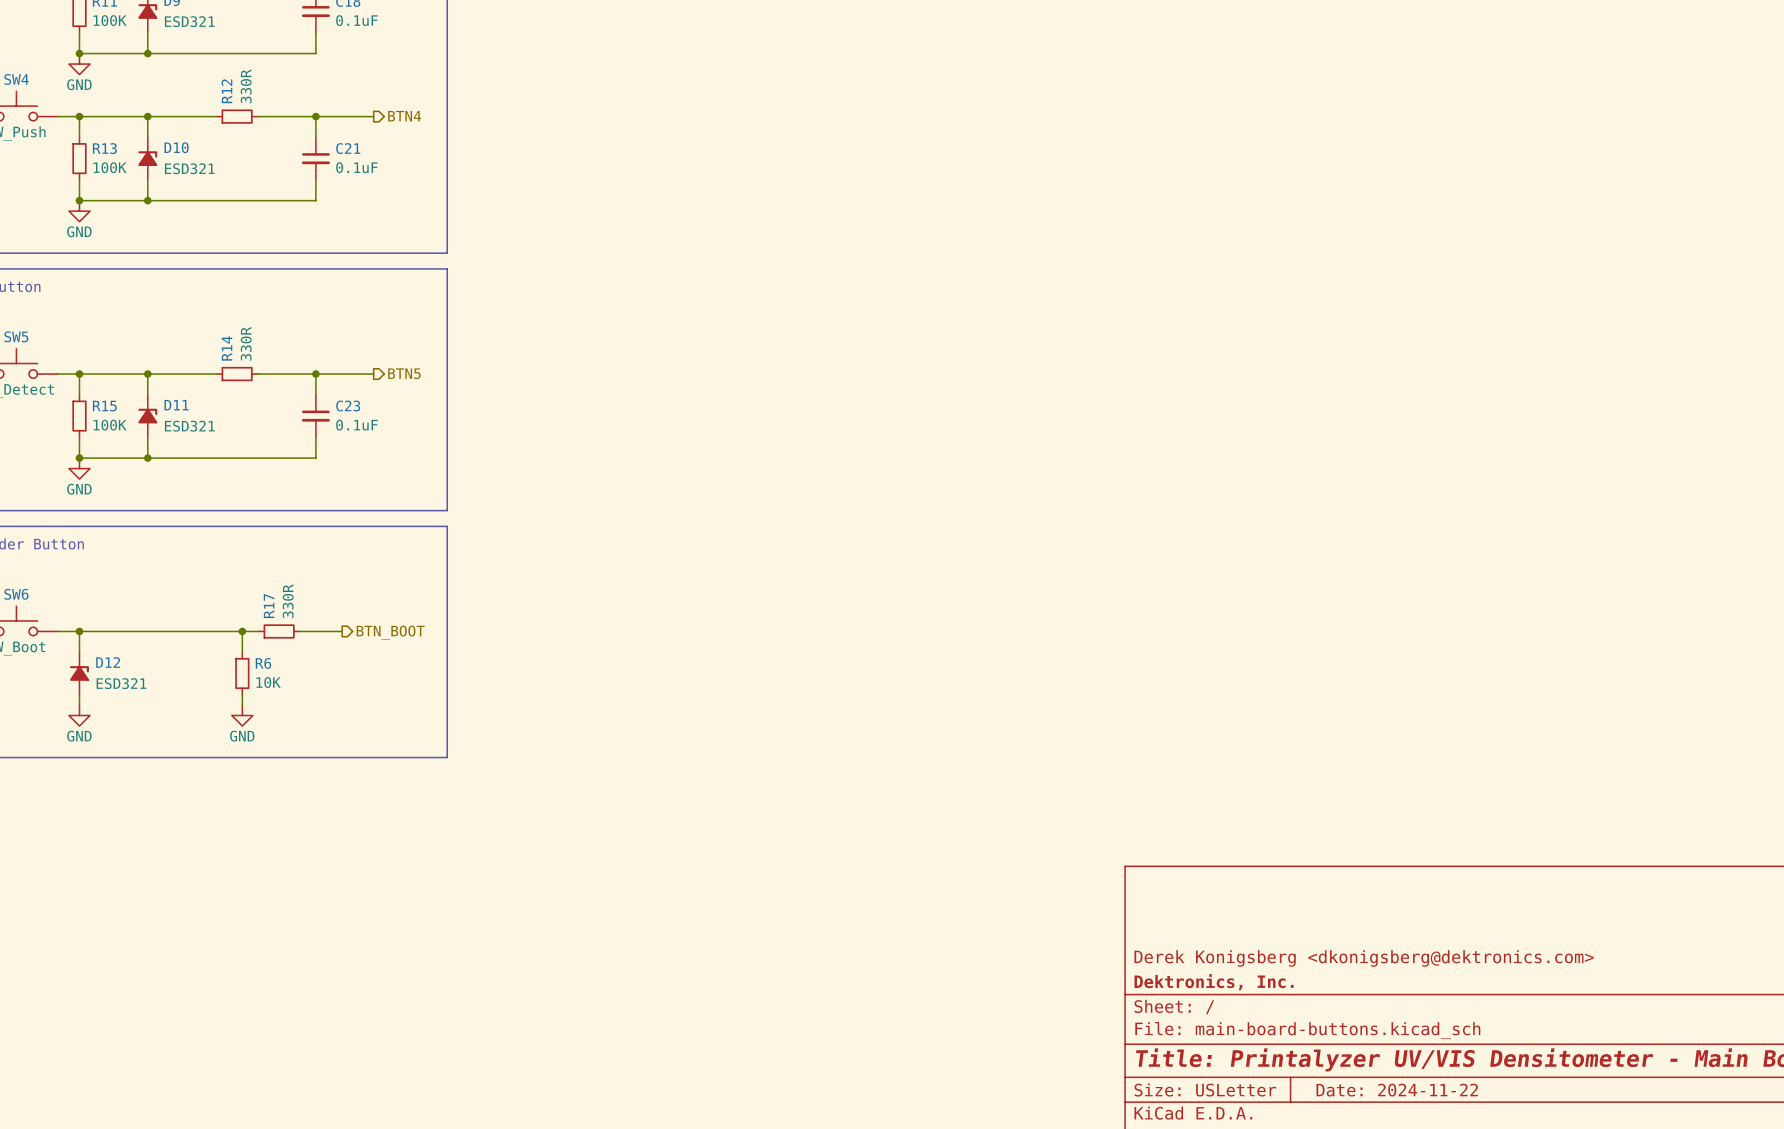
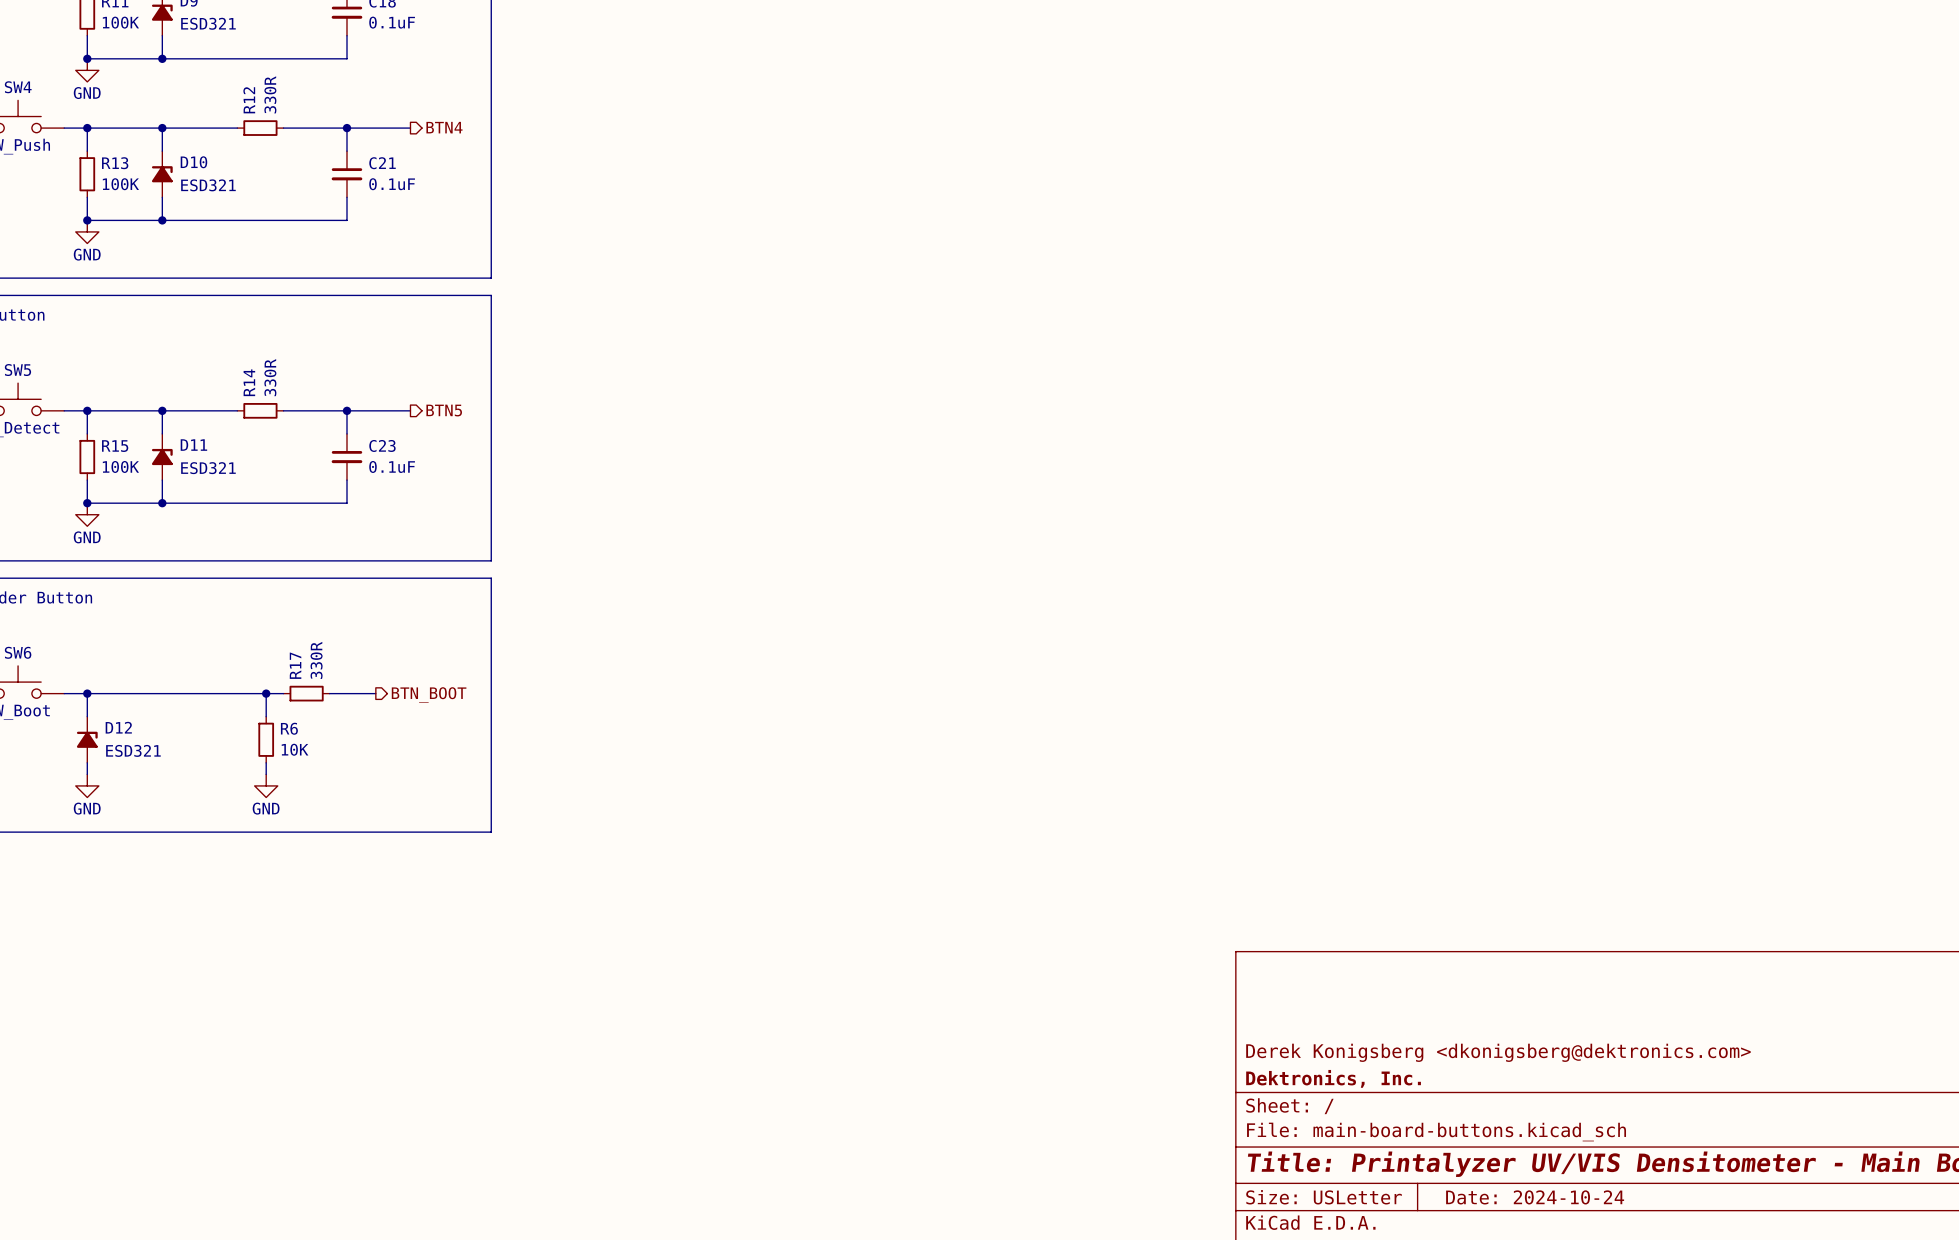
title block: Date: 2024-11-22 (1397, 1090) -> Date: 2024-10-24 (1535, 1197)

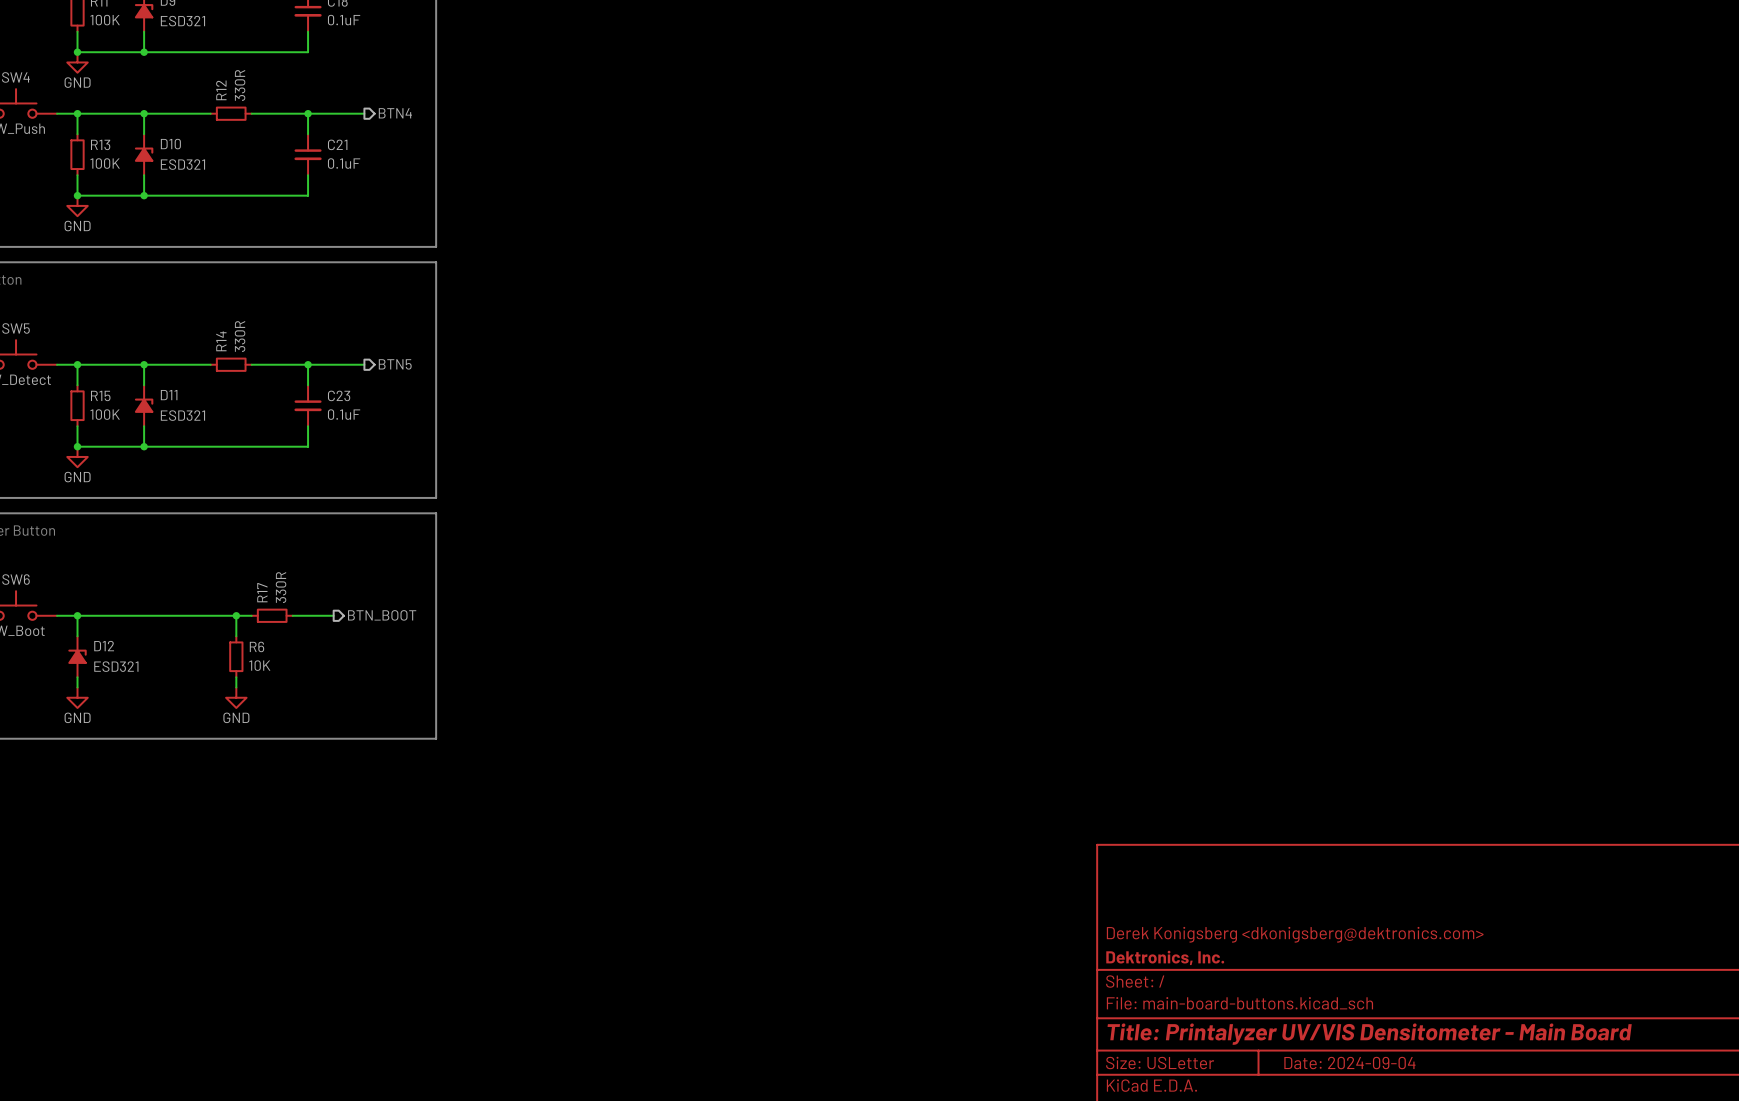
title block: Date: 2024-10-24 (1535, 1197) -> Date: 2024-09-04 (1349, 1063)

